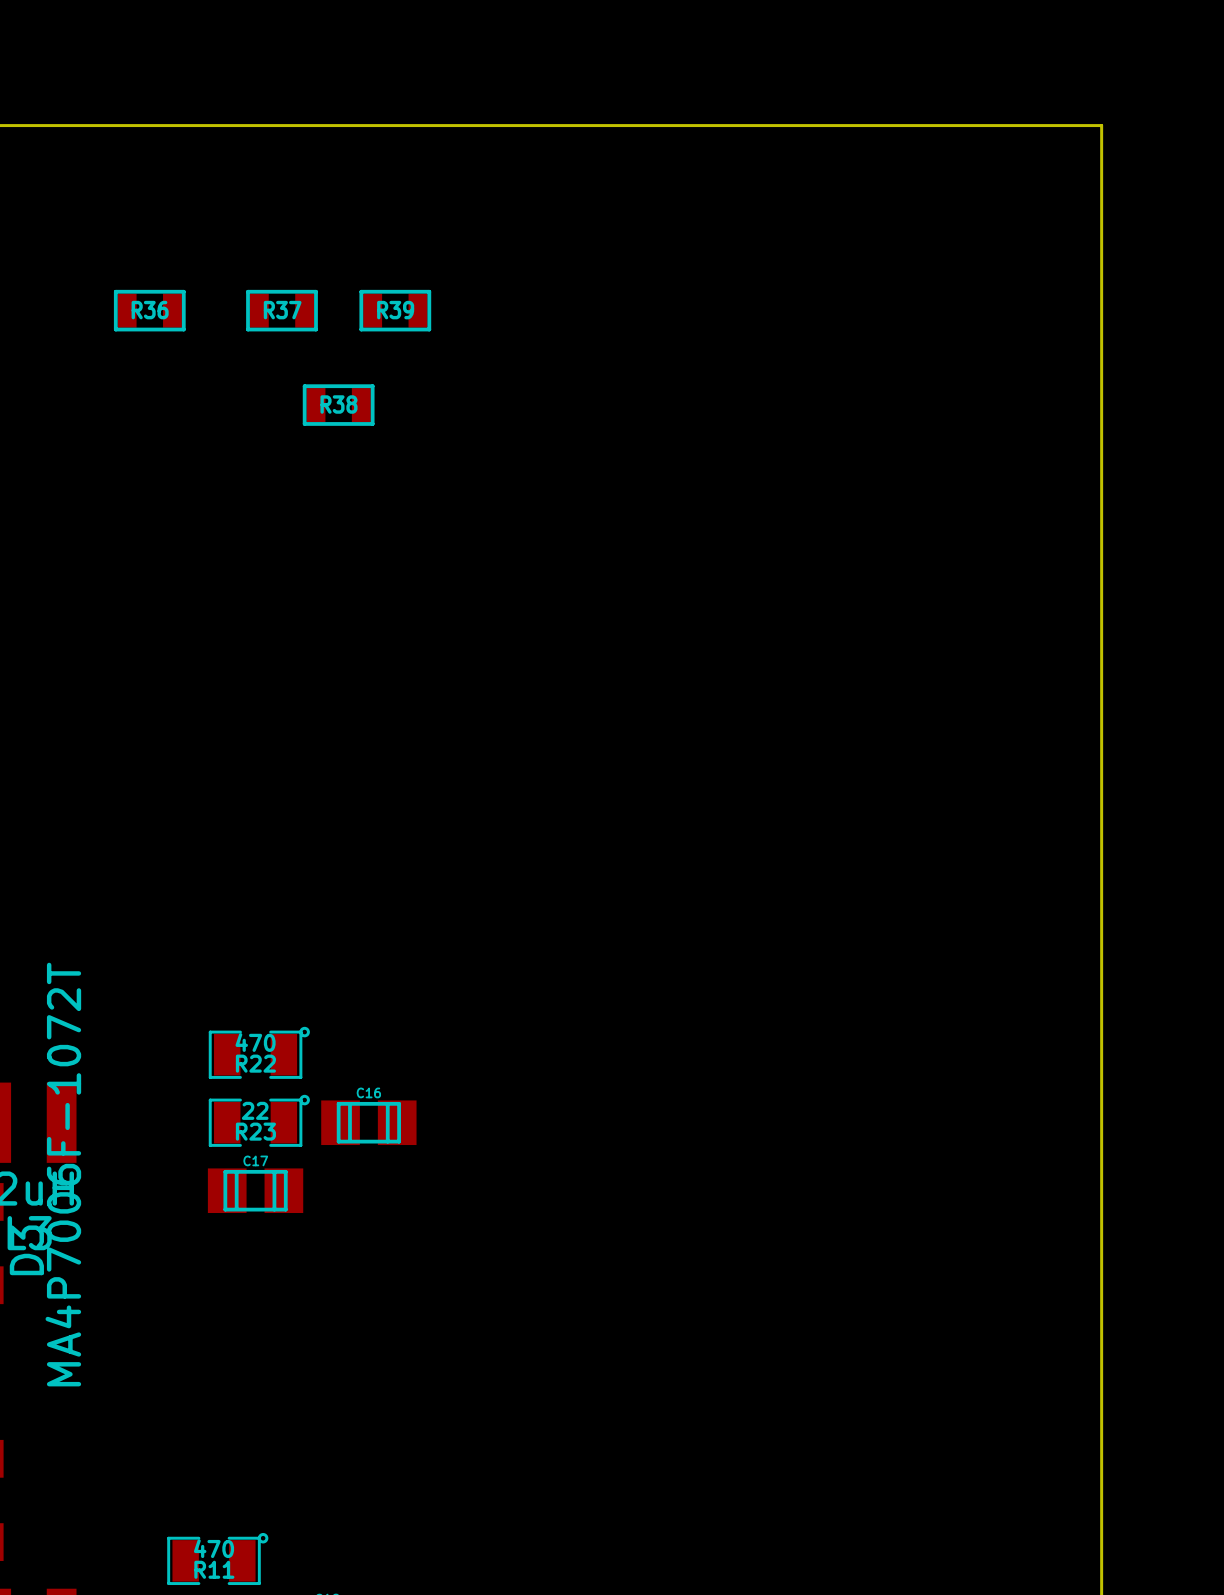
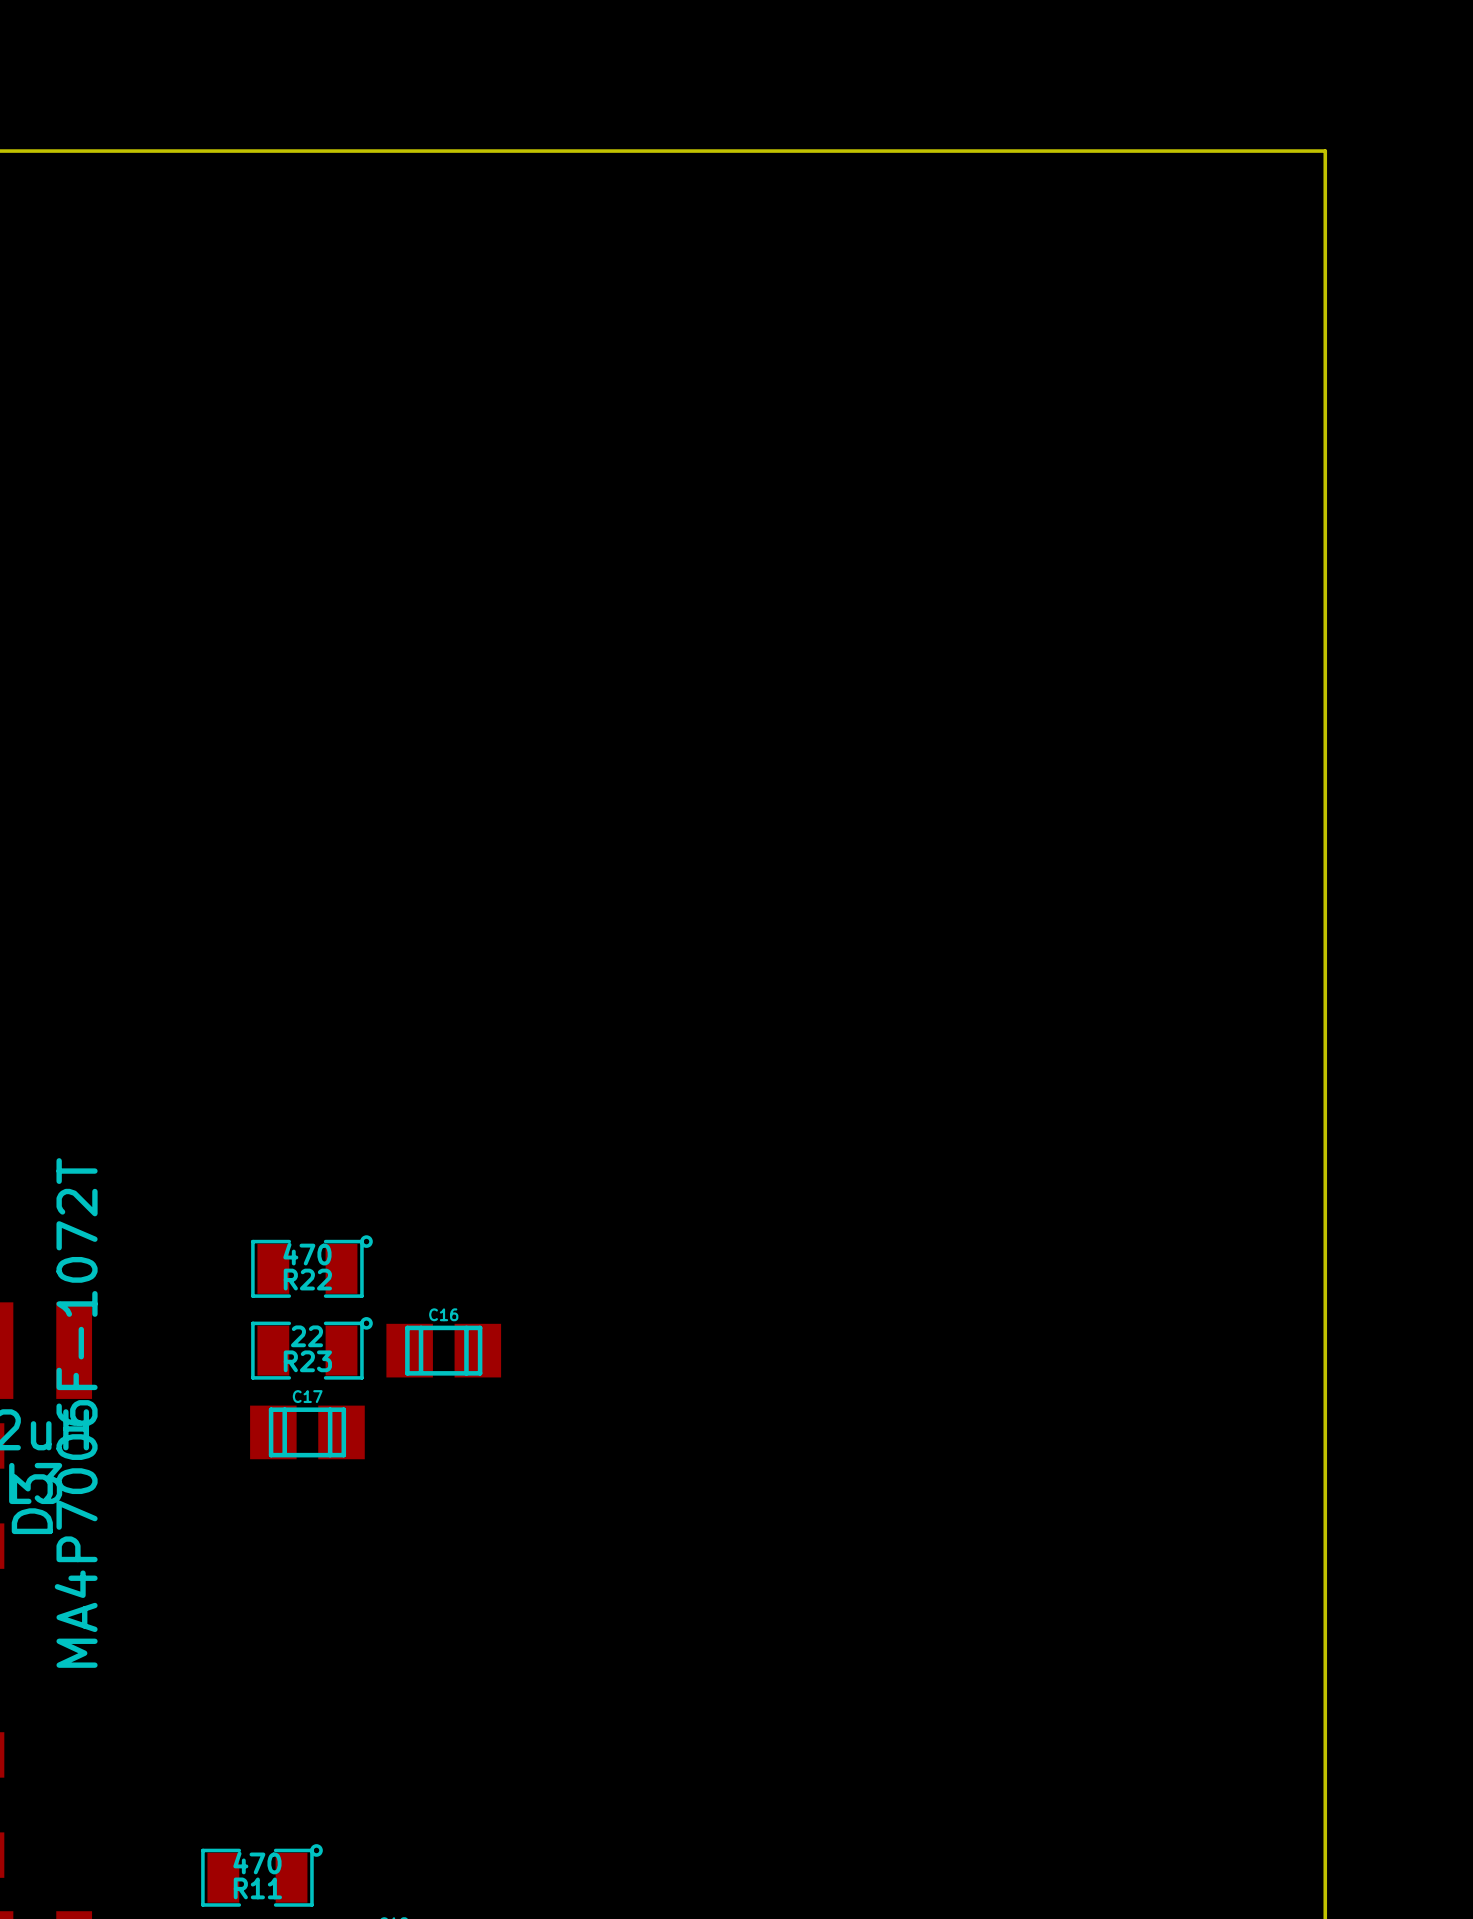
R36: (149, 310) -> none
R37: (281, 310) -> none
R39: (395, 310) -> none
R38: (338, 405) -> none

